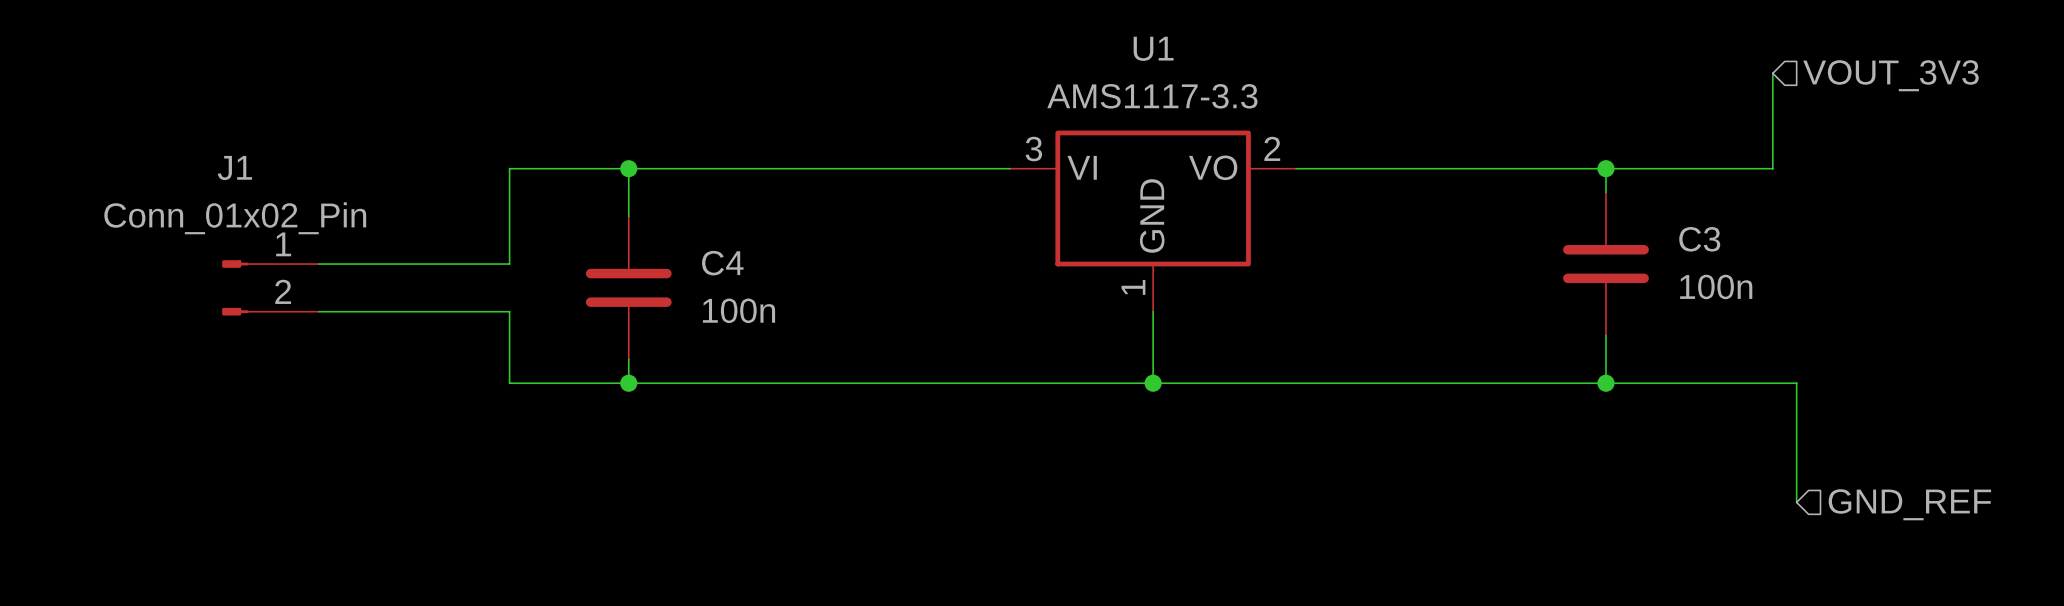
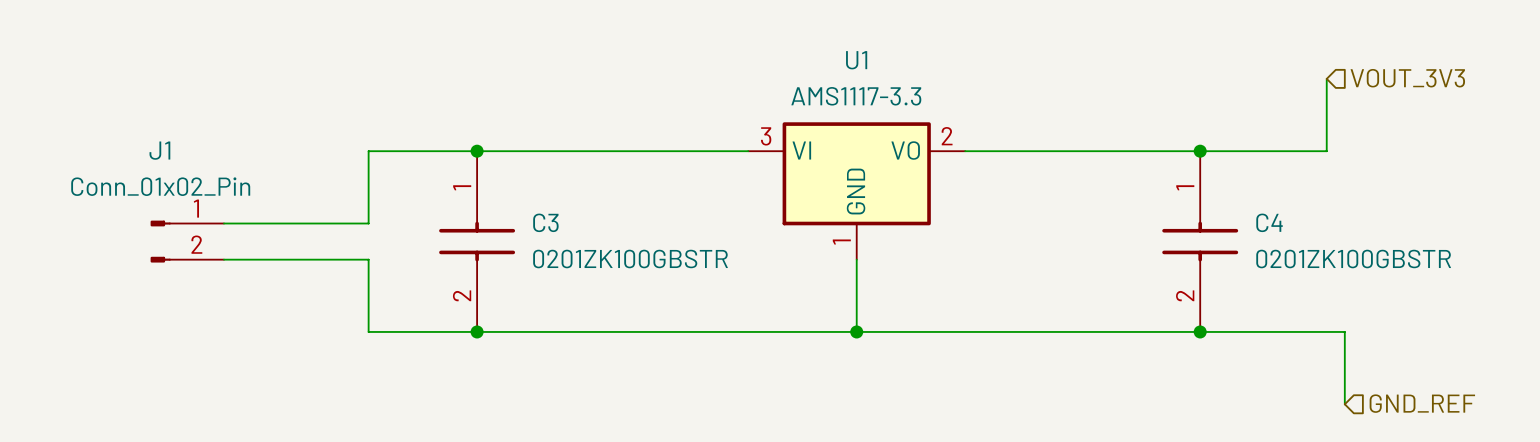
wire: (628, 168) (628, 216) -> none
junction position: (628, 168) -> (477, 151)
C3 symbol: [1563, 192, 1649, 336] -> [439, 151, 516, 332]
C4 symbol: [585, 216, 672, 360] -> [1162, 151, 1239, 332]
C3 value: 100n (1716, 286) -> 0201ZK100GBSTR (630, 259)
C4 value: 100n (739, 310) -> 0201ZK100GBSTR (1353, 259)
wire: (628, 359) (628, 383) -> none
wire: (509, 383) (1796, 383) (1796, 407) -> (368, 313) (368, 331) (1344, 331)
junction position: (628, 383) -> (477, 331)
wire: none -> (856, 313) (856, 331)
junction position: (1153, 383) -> (856, 331)
junction position: (1605, 383) -> (1200, 331)

